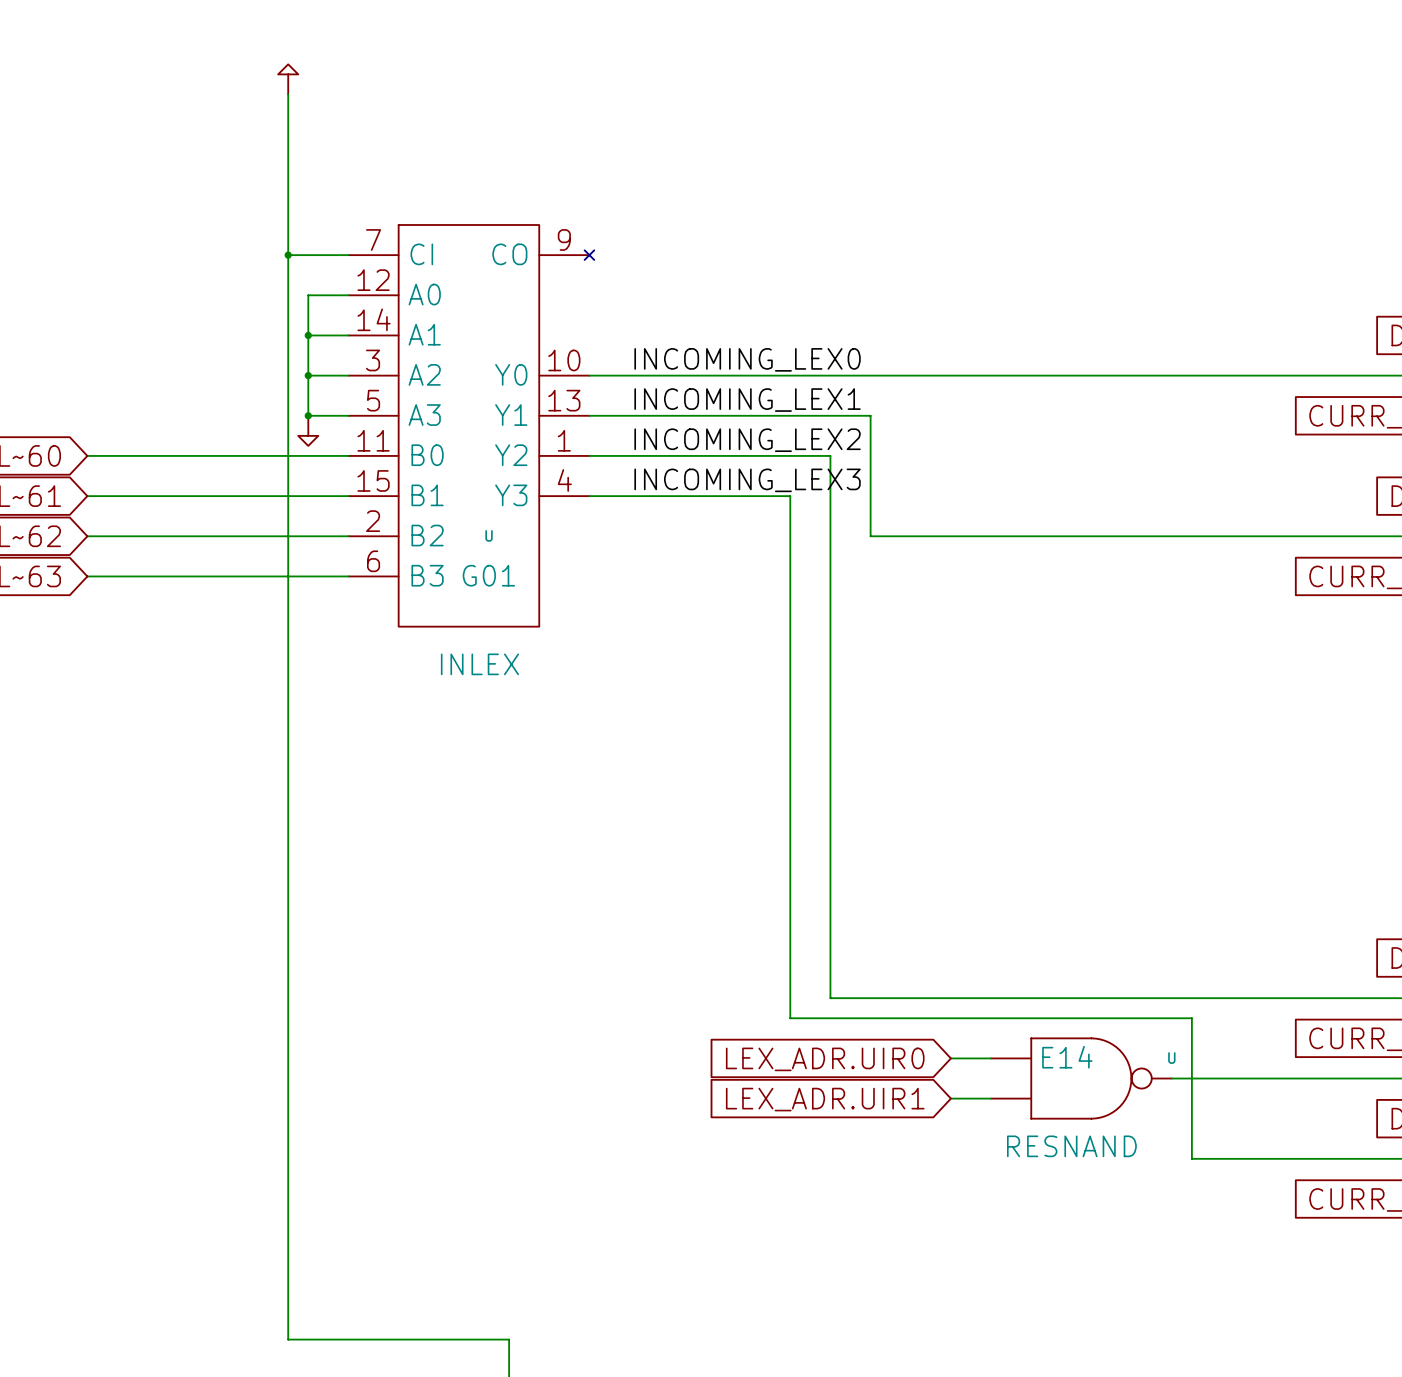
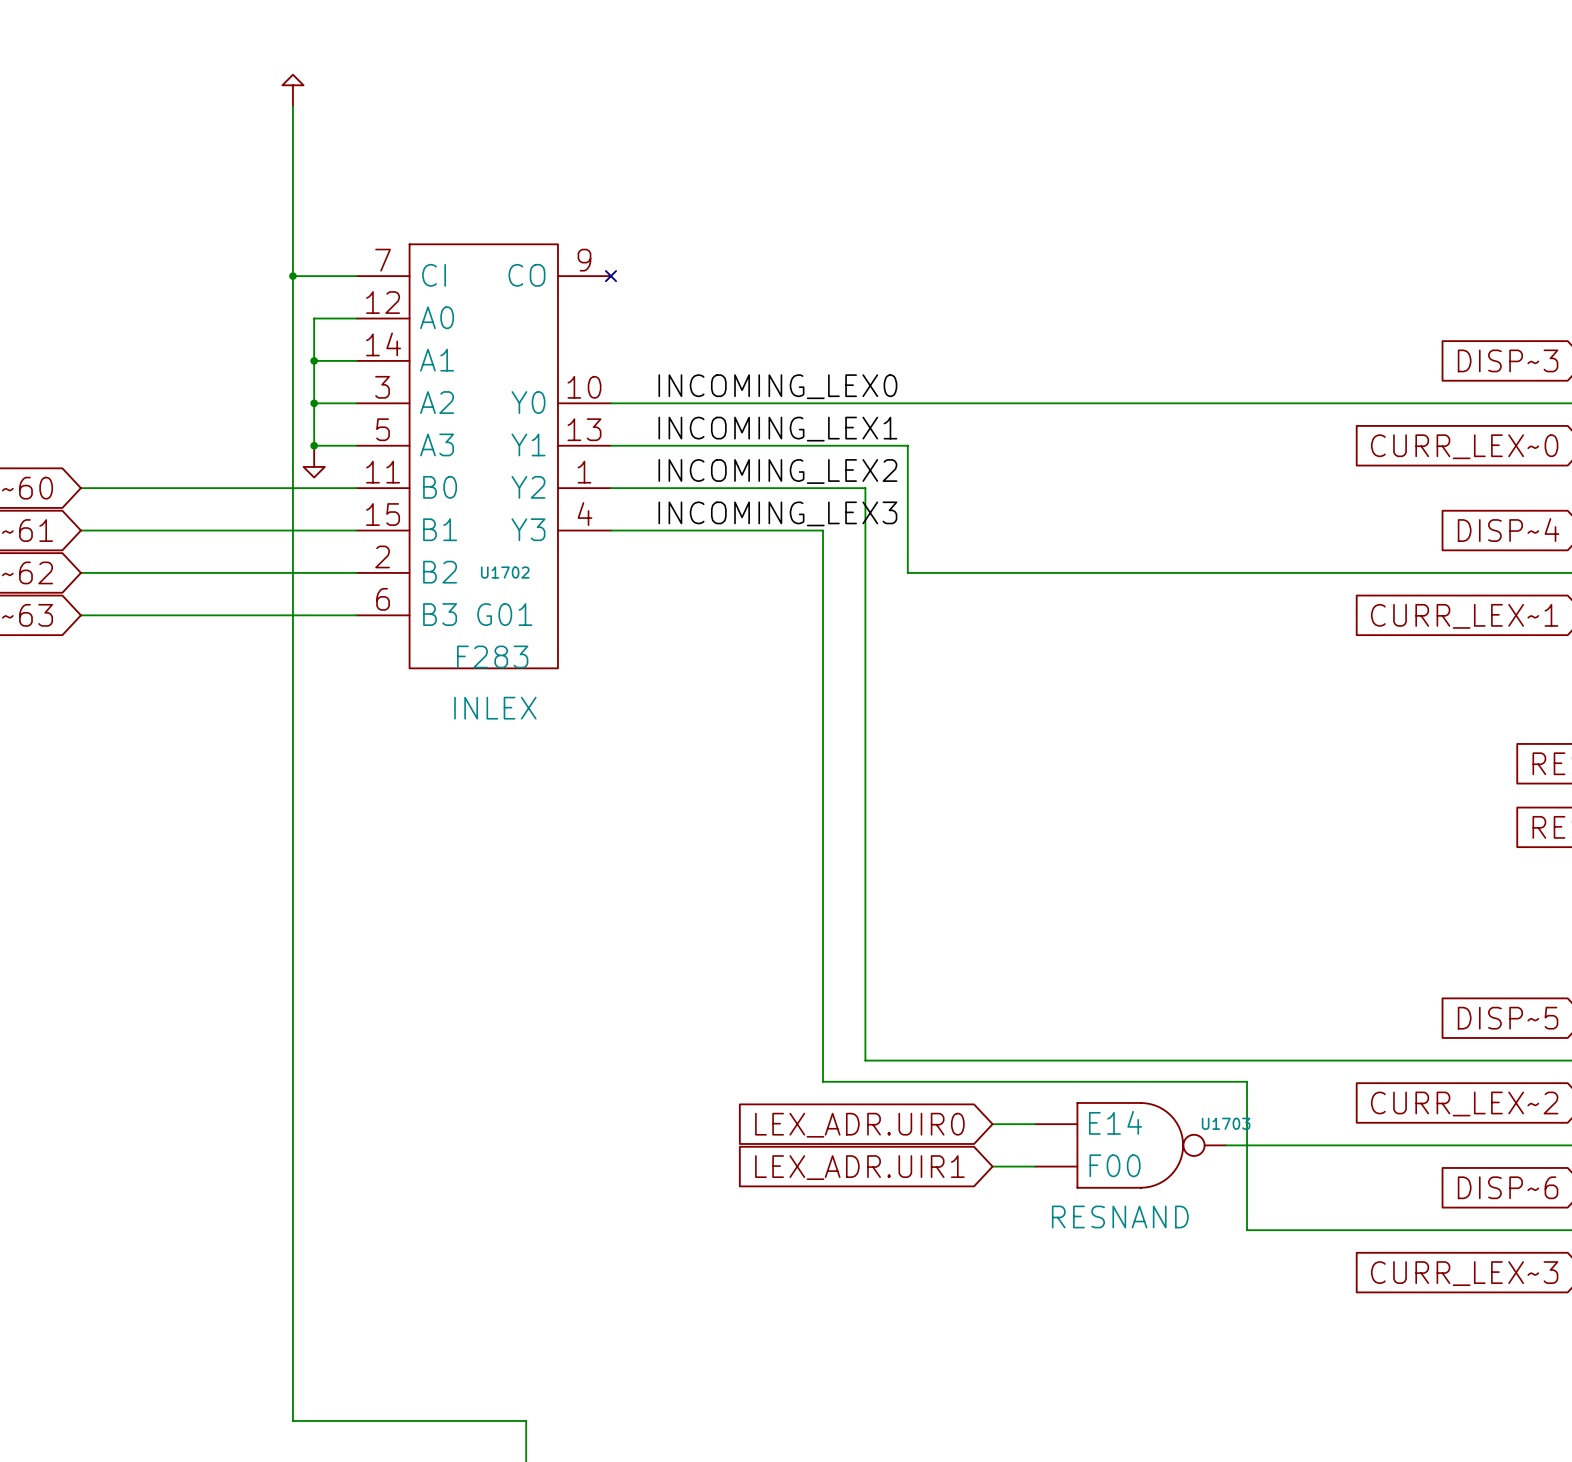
U name: U (489, 535) -> U1702 (505, 572)
U value: none -> F283 (492, 656)
U name: U (1171, 1058) -> U1703 (1226, 1123)
U value: none -> F00 (1115, 1165)

